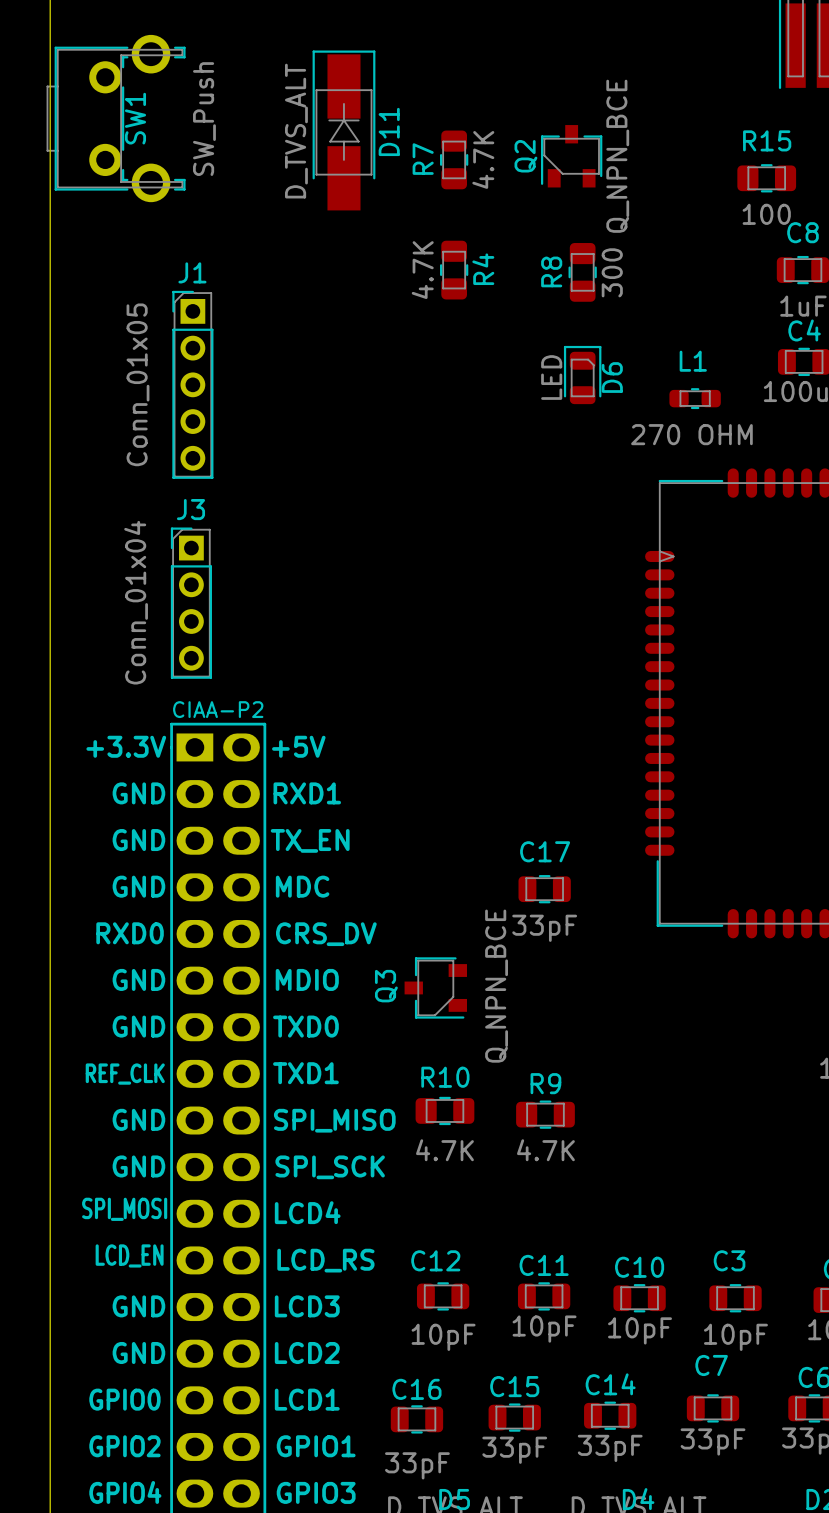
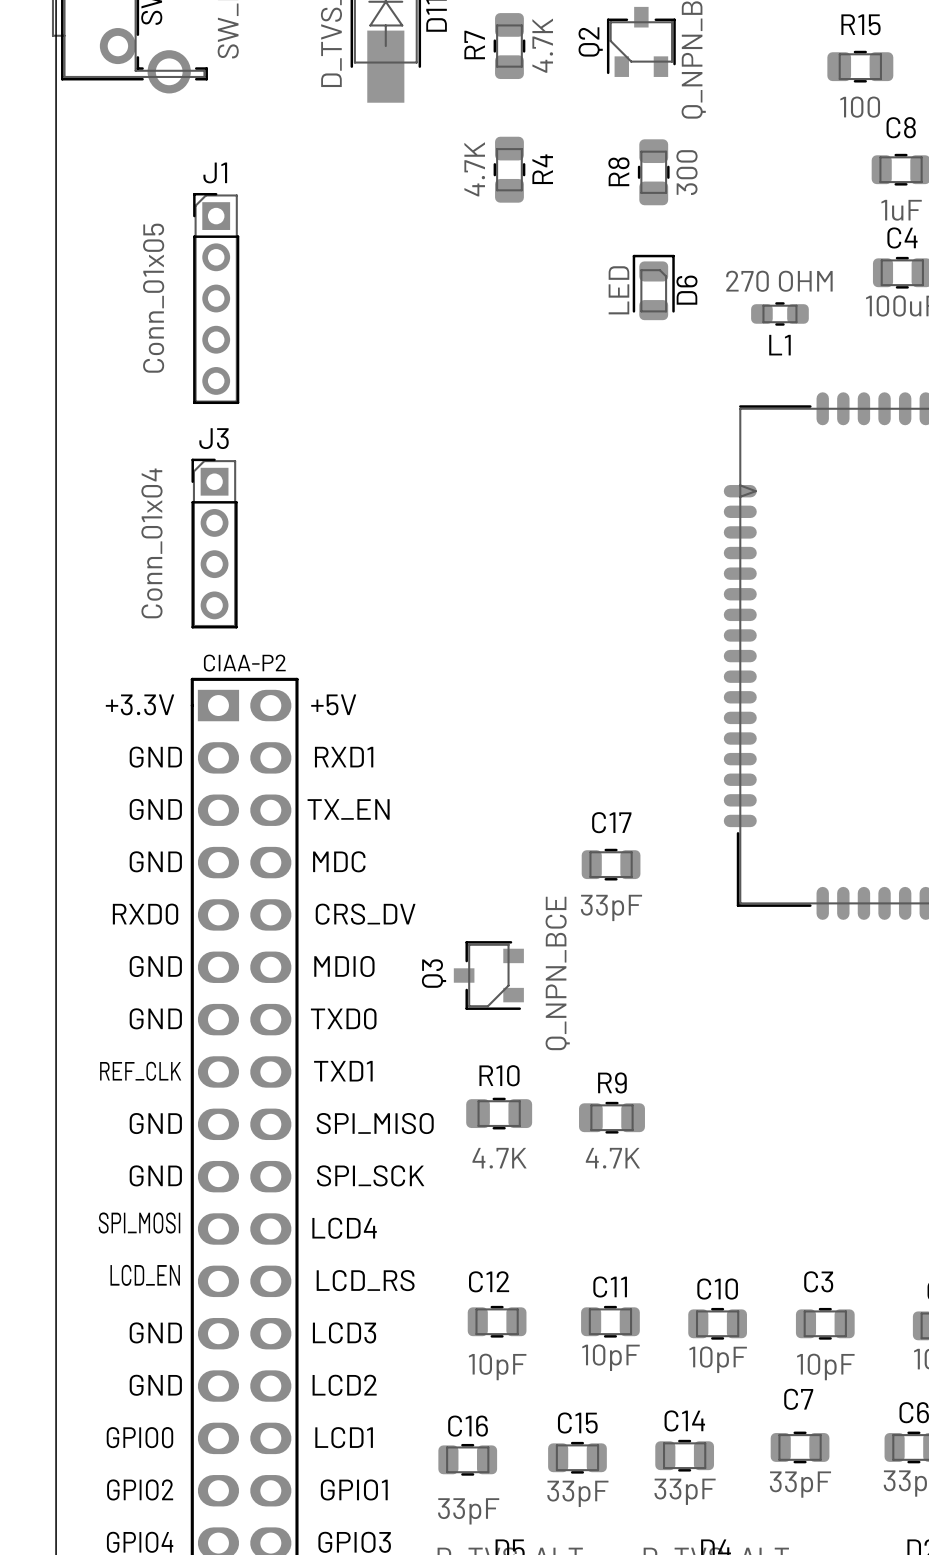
L1 name position: L1 (693, 361) -> L1 (779, 345)
L1 value position: 270 OHM (691, 434) -> 270 OHM (779, 281)

